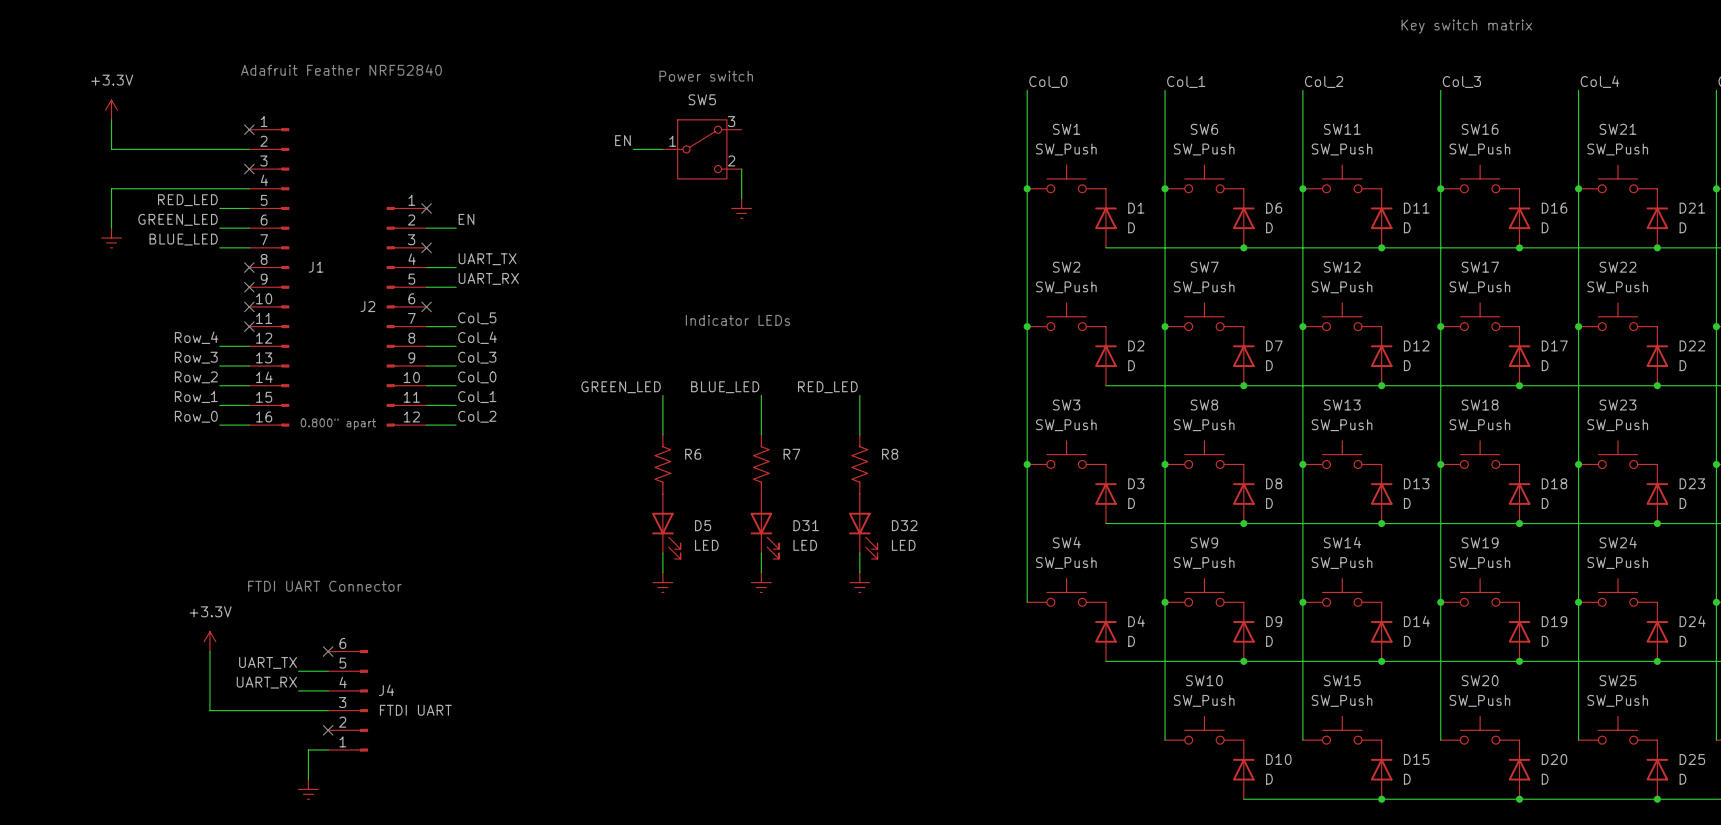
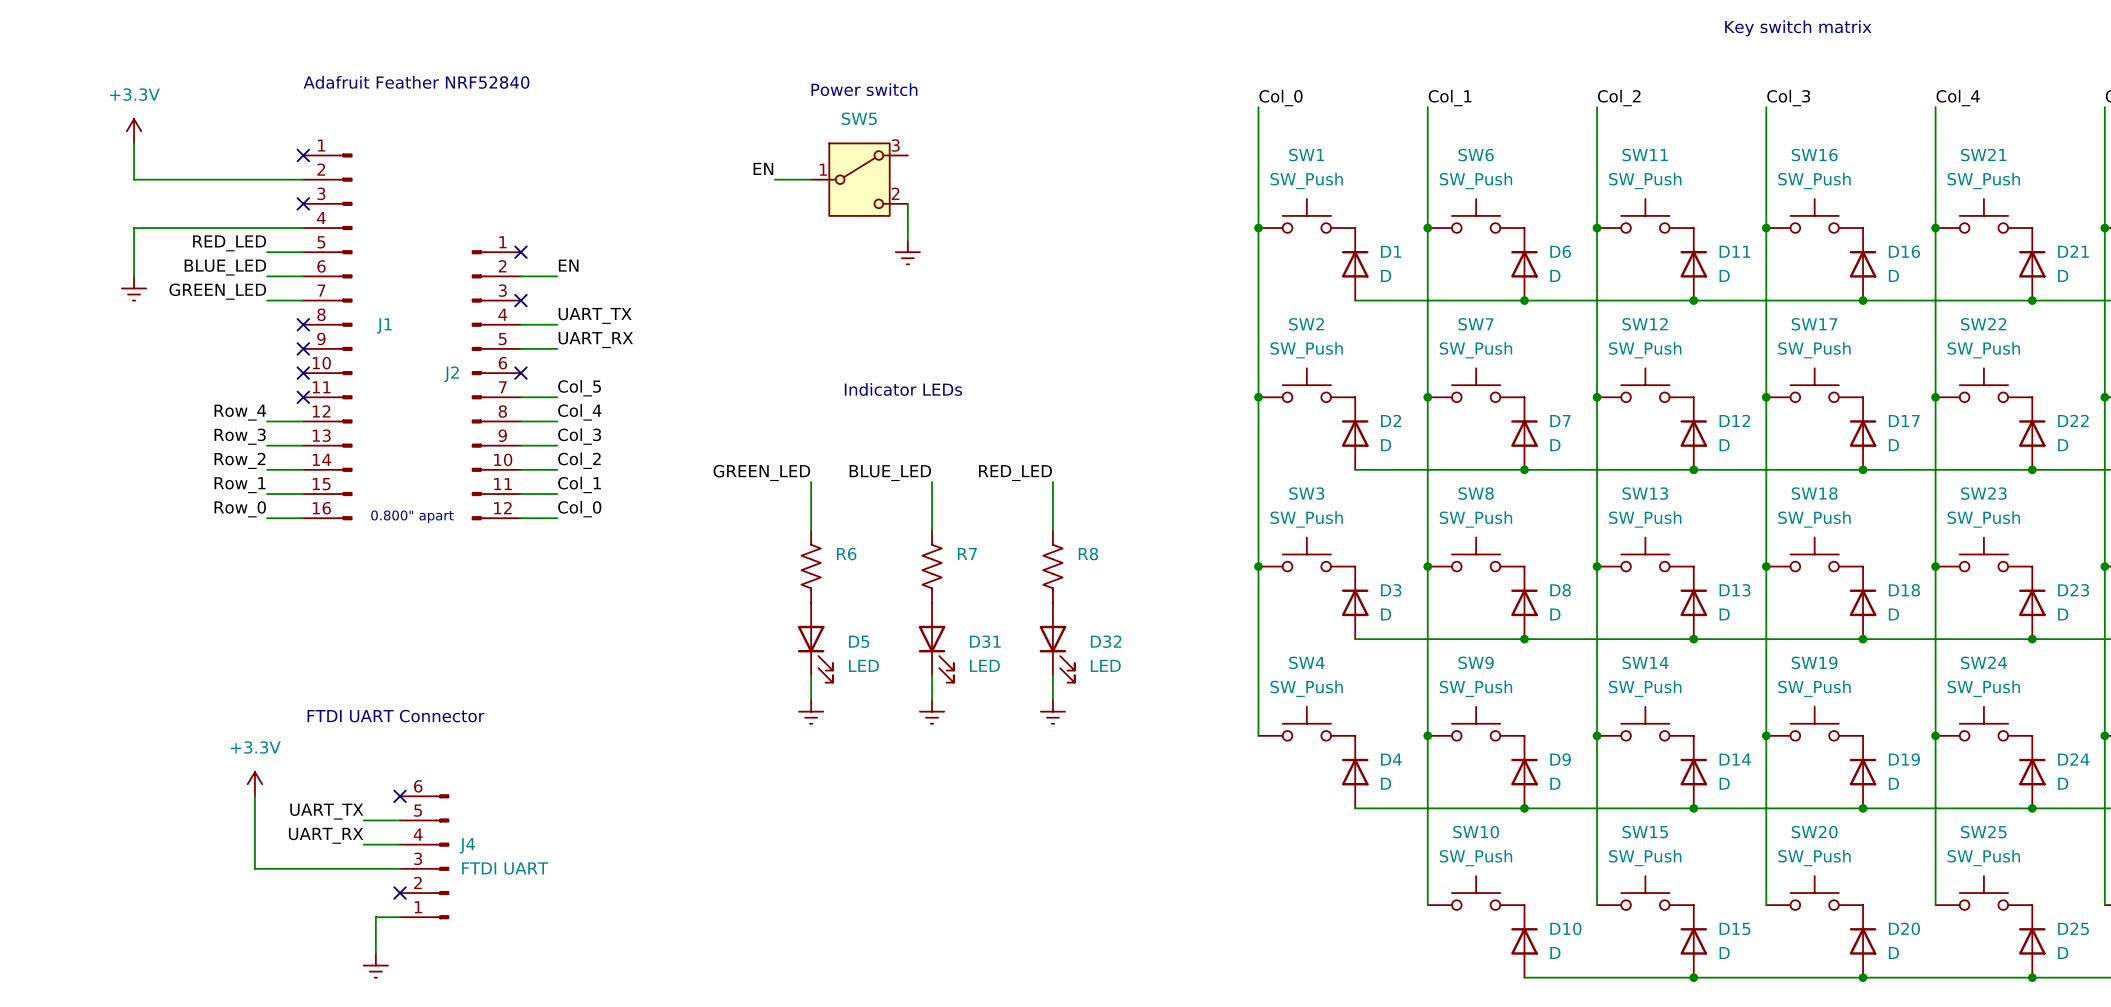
label: GREEN_LED (178, 219) -> BLUE_LED (225, 267)
label: BLUE_LED (183, 239) -> GREEN_LED (217, 291)
label: Col_0 (477, 377) -> Col_2 (579, 460)
label: Col_2 (477, 416) -> Col_0 (579, 509)

